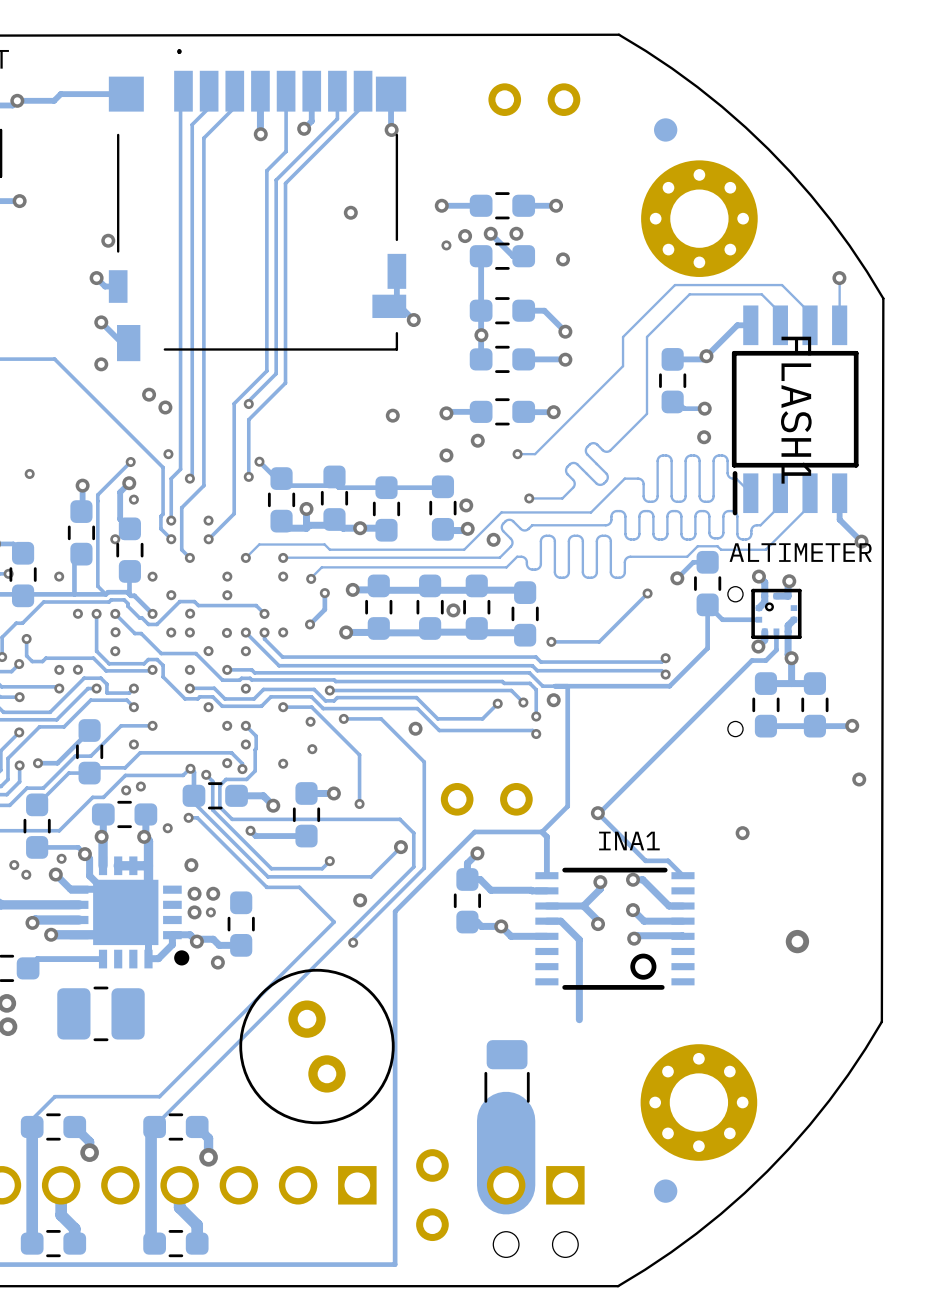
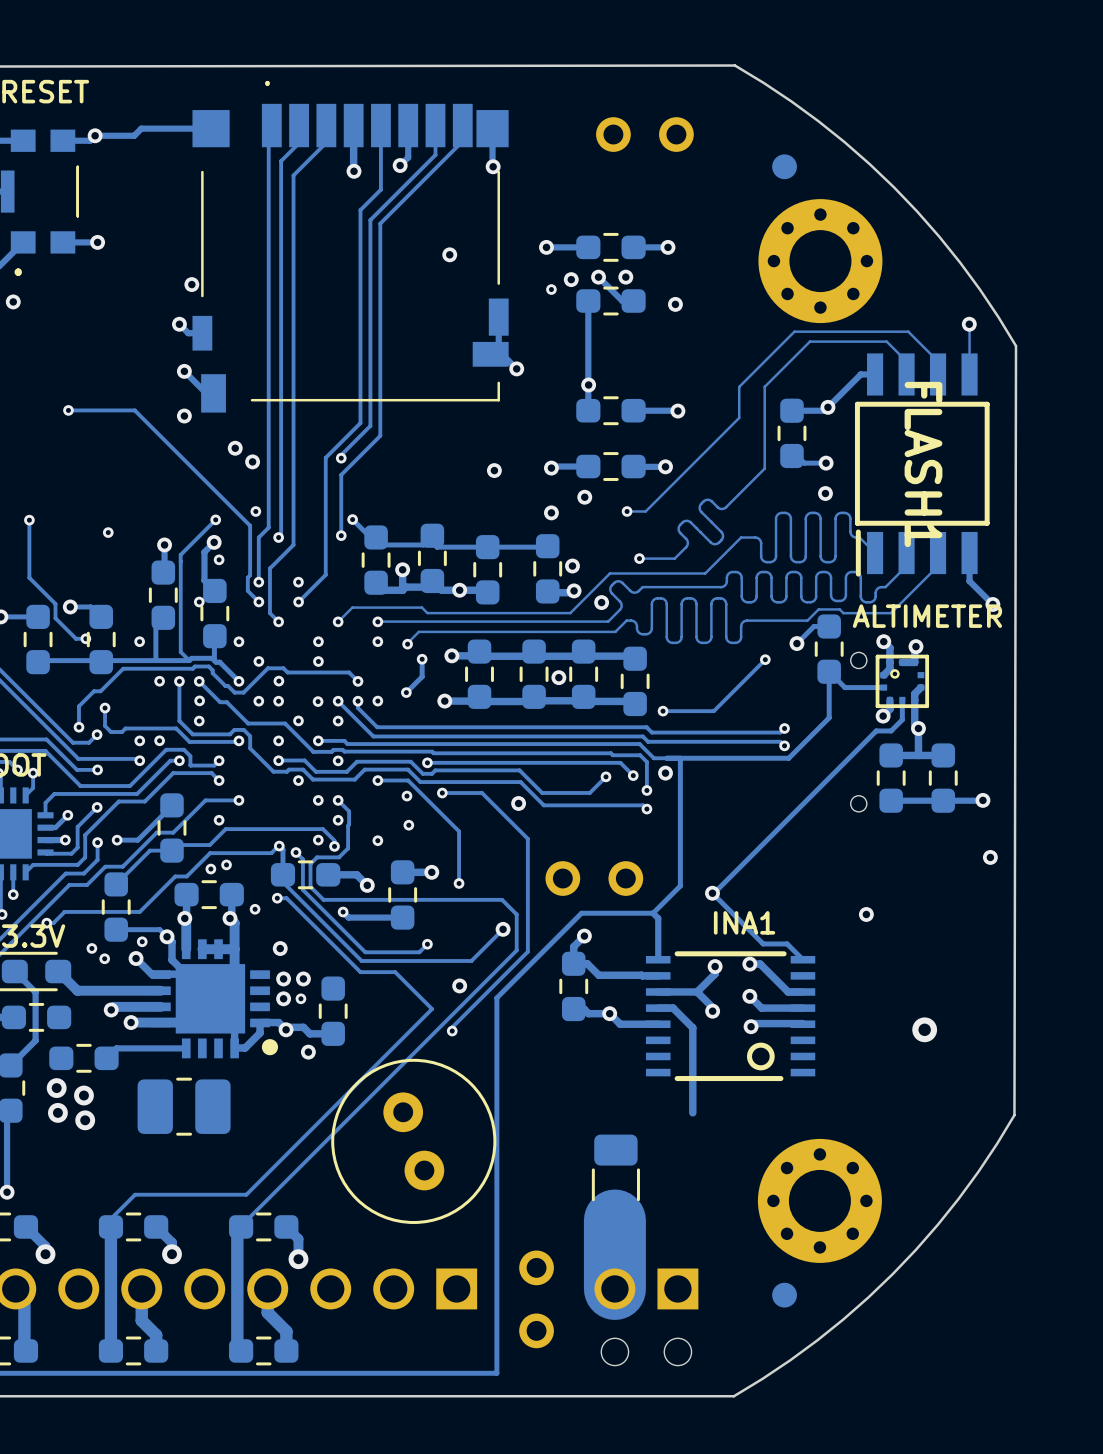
part: (502, 310) -> none
track: (523, 310) (544, 310) (565, 331) -> none
via: (565, 331) -> none

